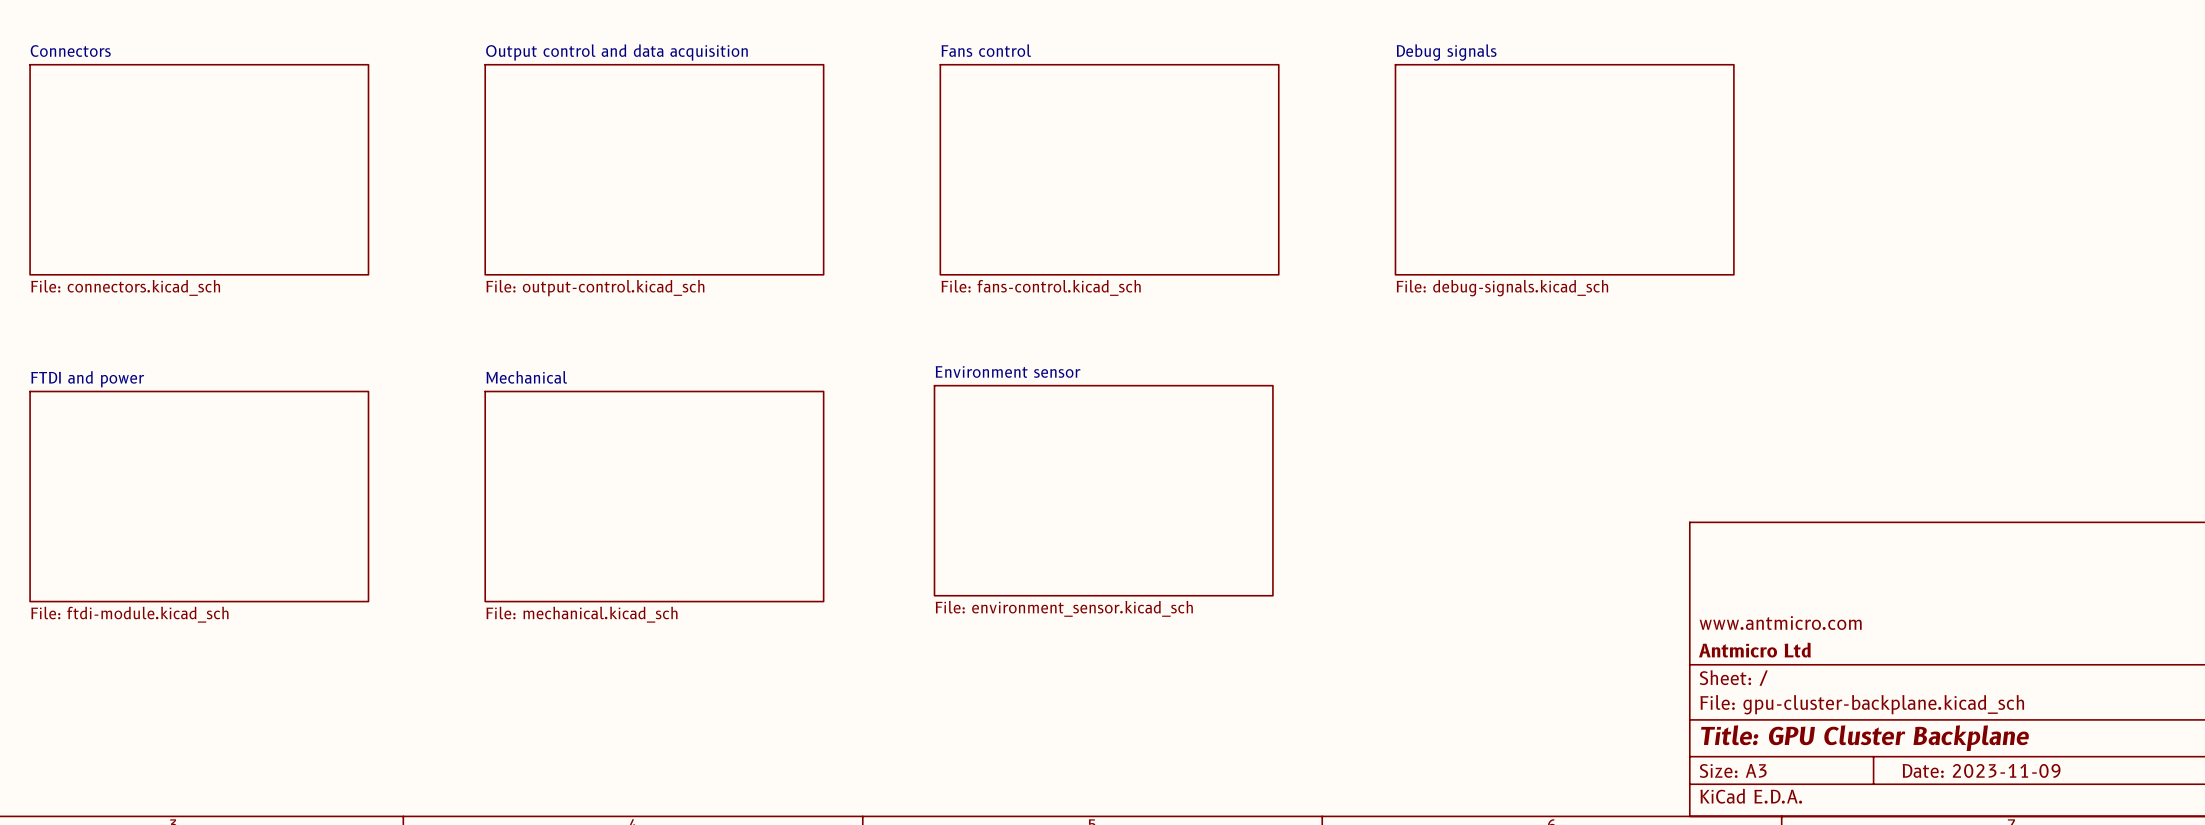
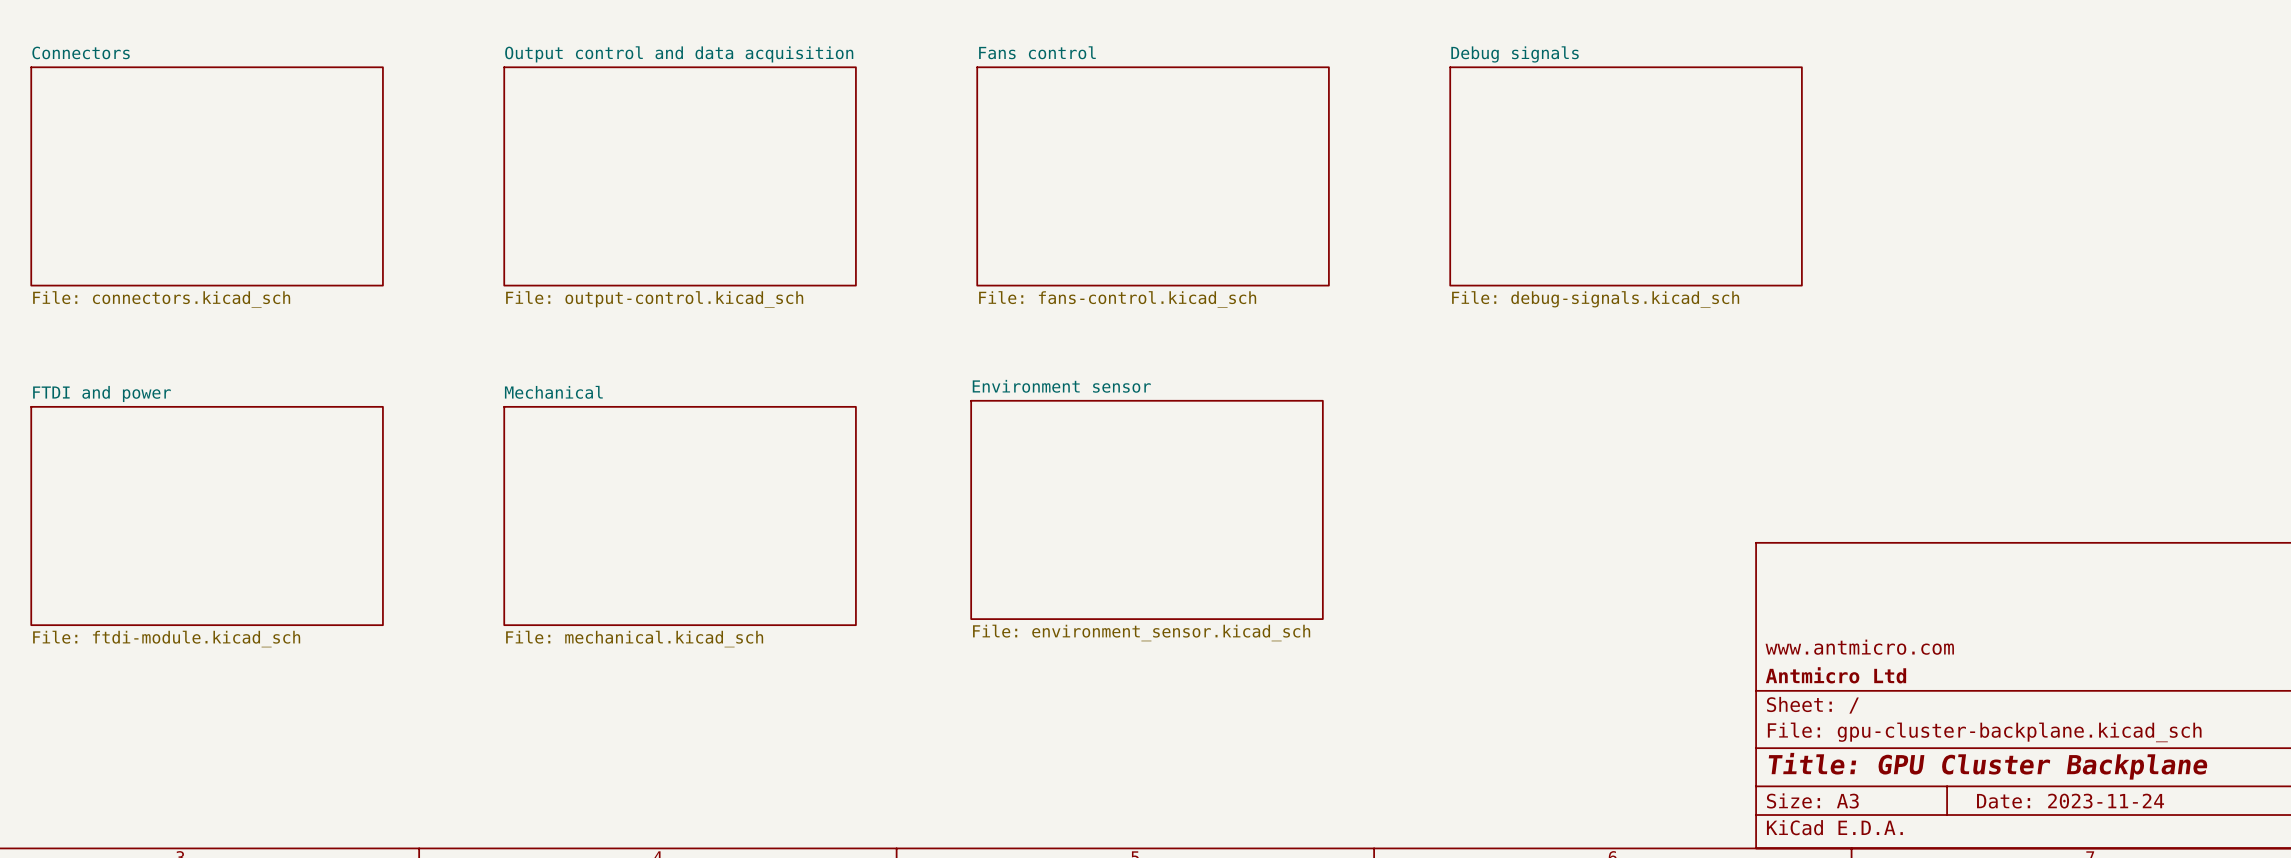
title block: Date: 2023-11-09 (1981, 770) -> Date: 2023-11-24 (2070, 801)

